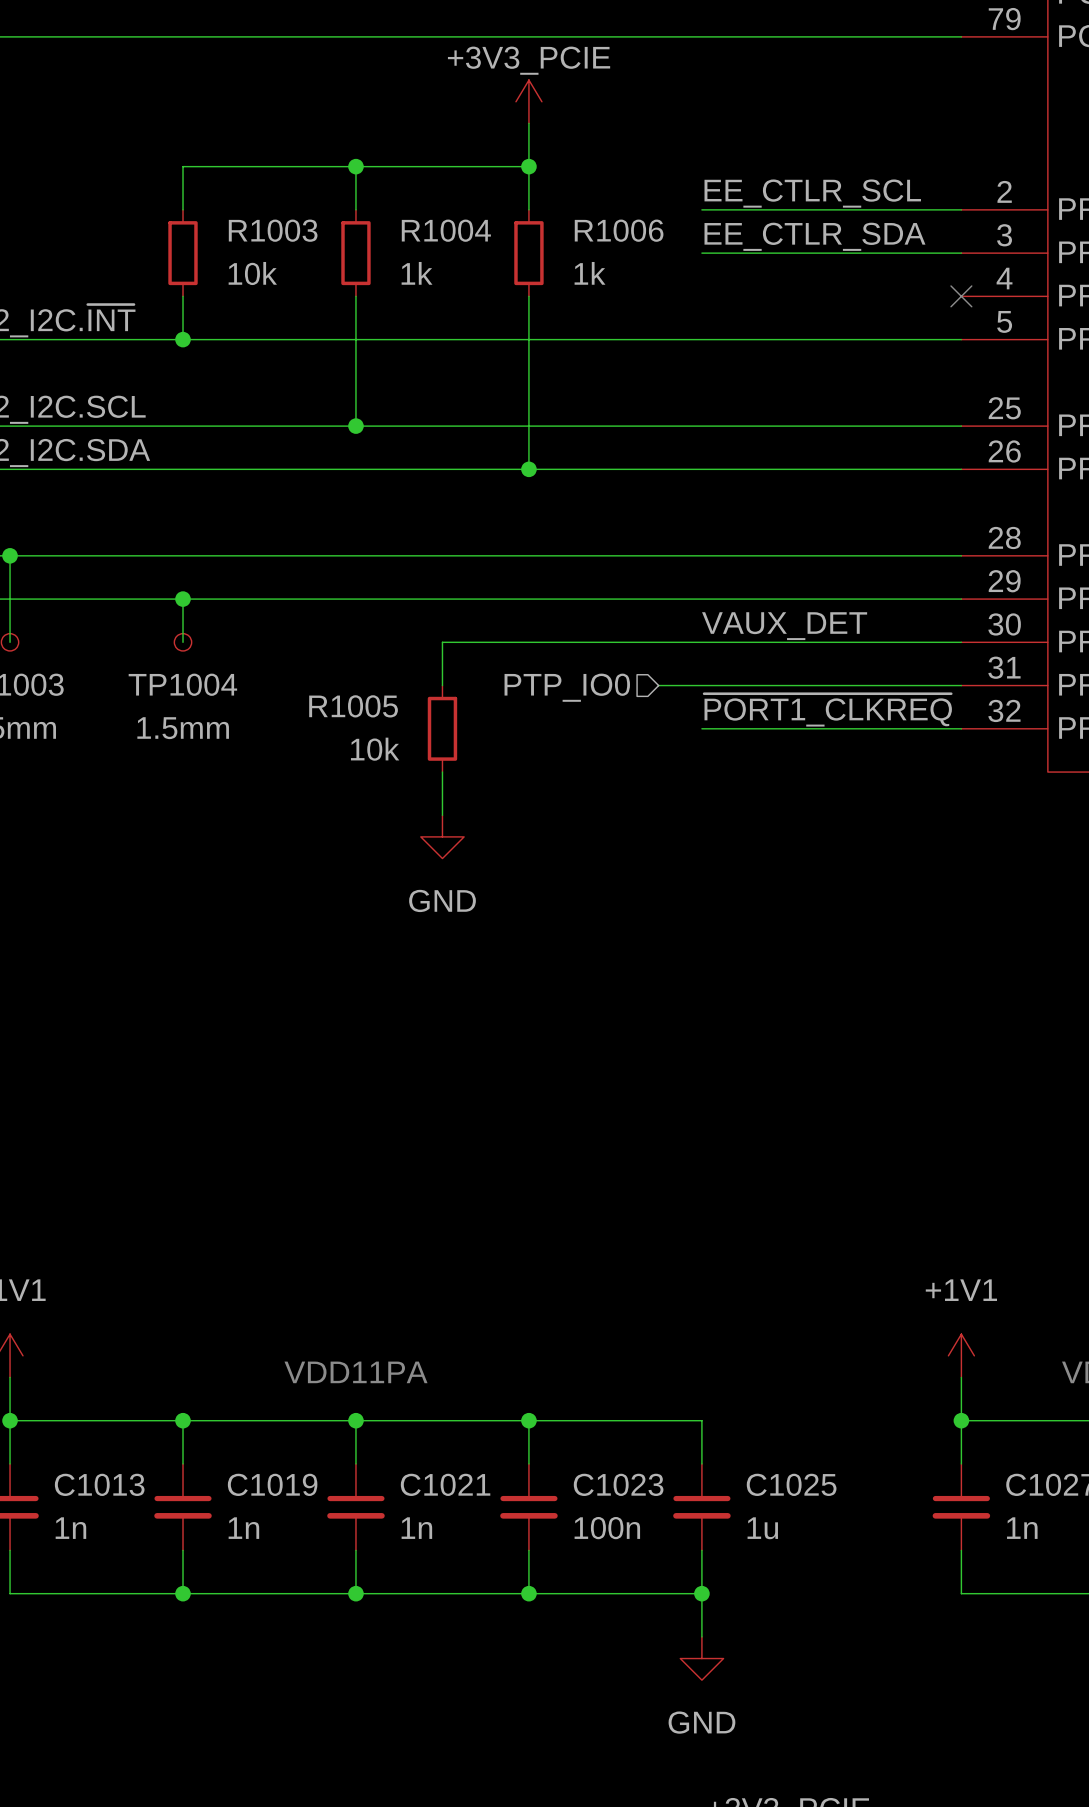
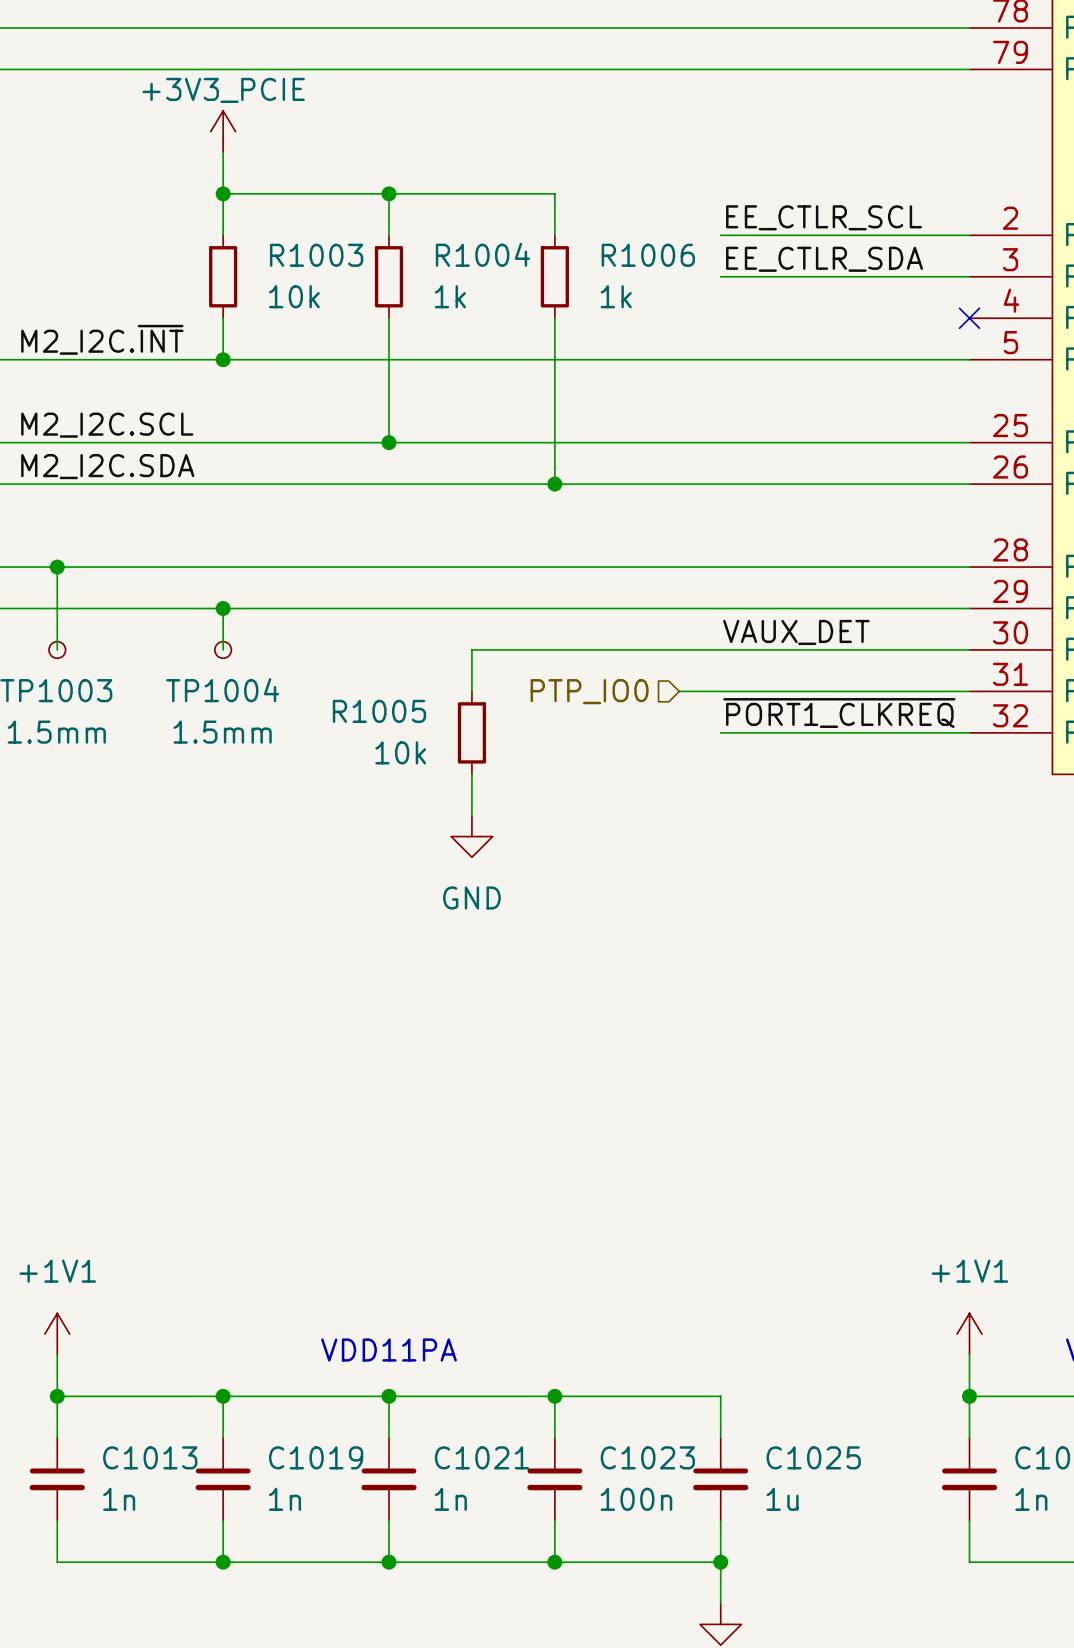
power symbol position: +3V3_PCIE (528, 101) -> +3V3_PCIE (223, 131)
wire: (528, 123) (528, 166) -> (223, 152) (223, 193)
junction: none -> (223, 193)
junction: (528, 166) -> none

